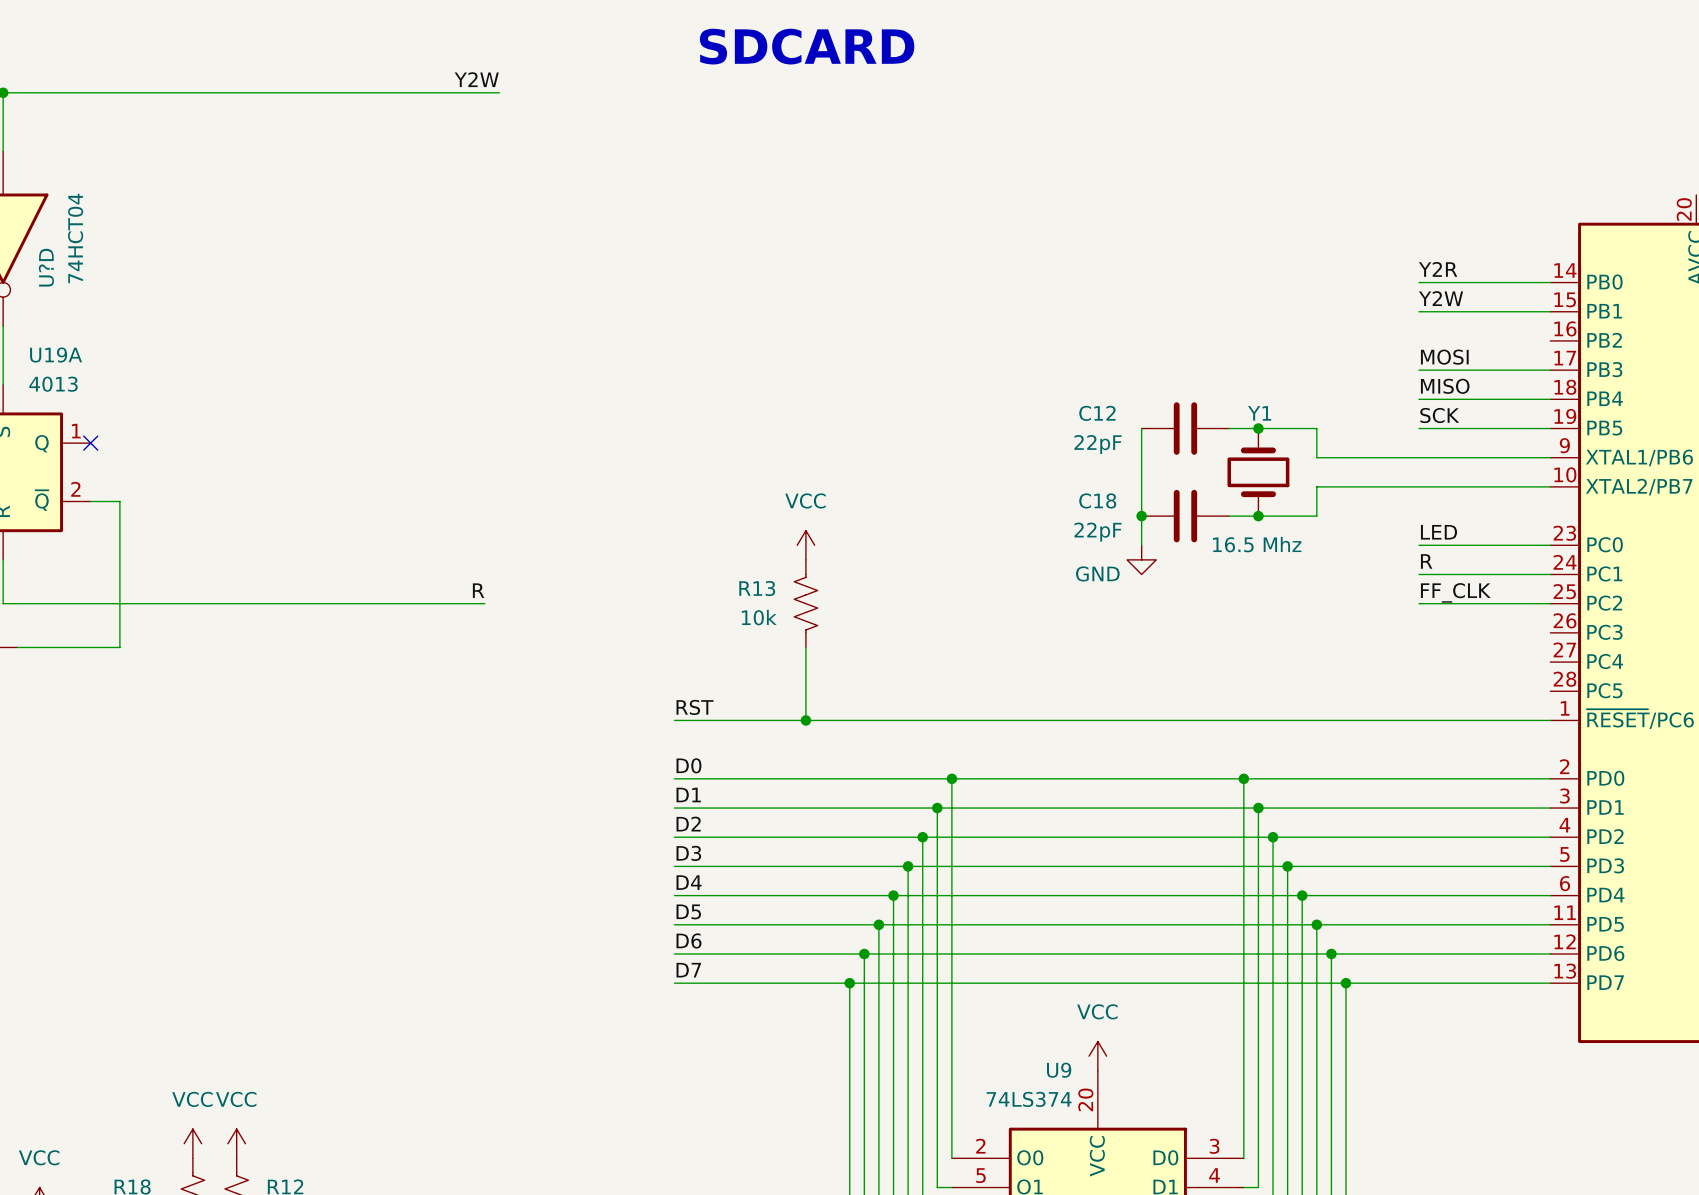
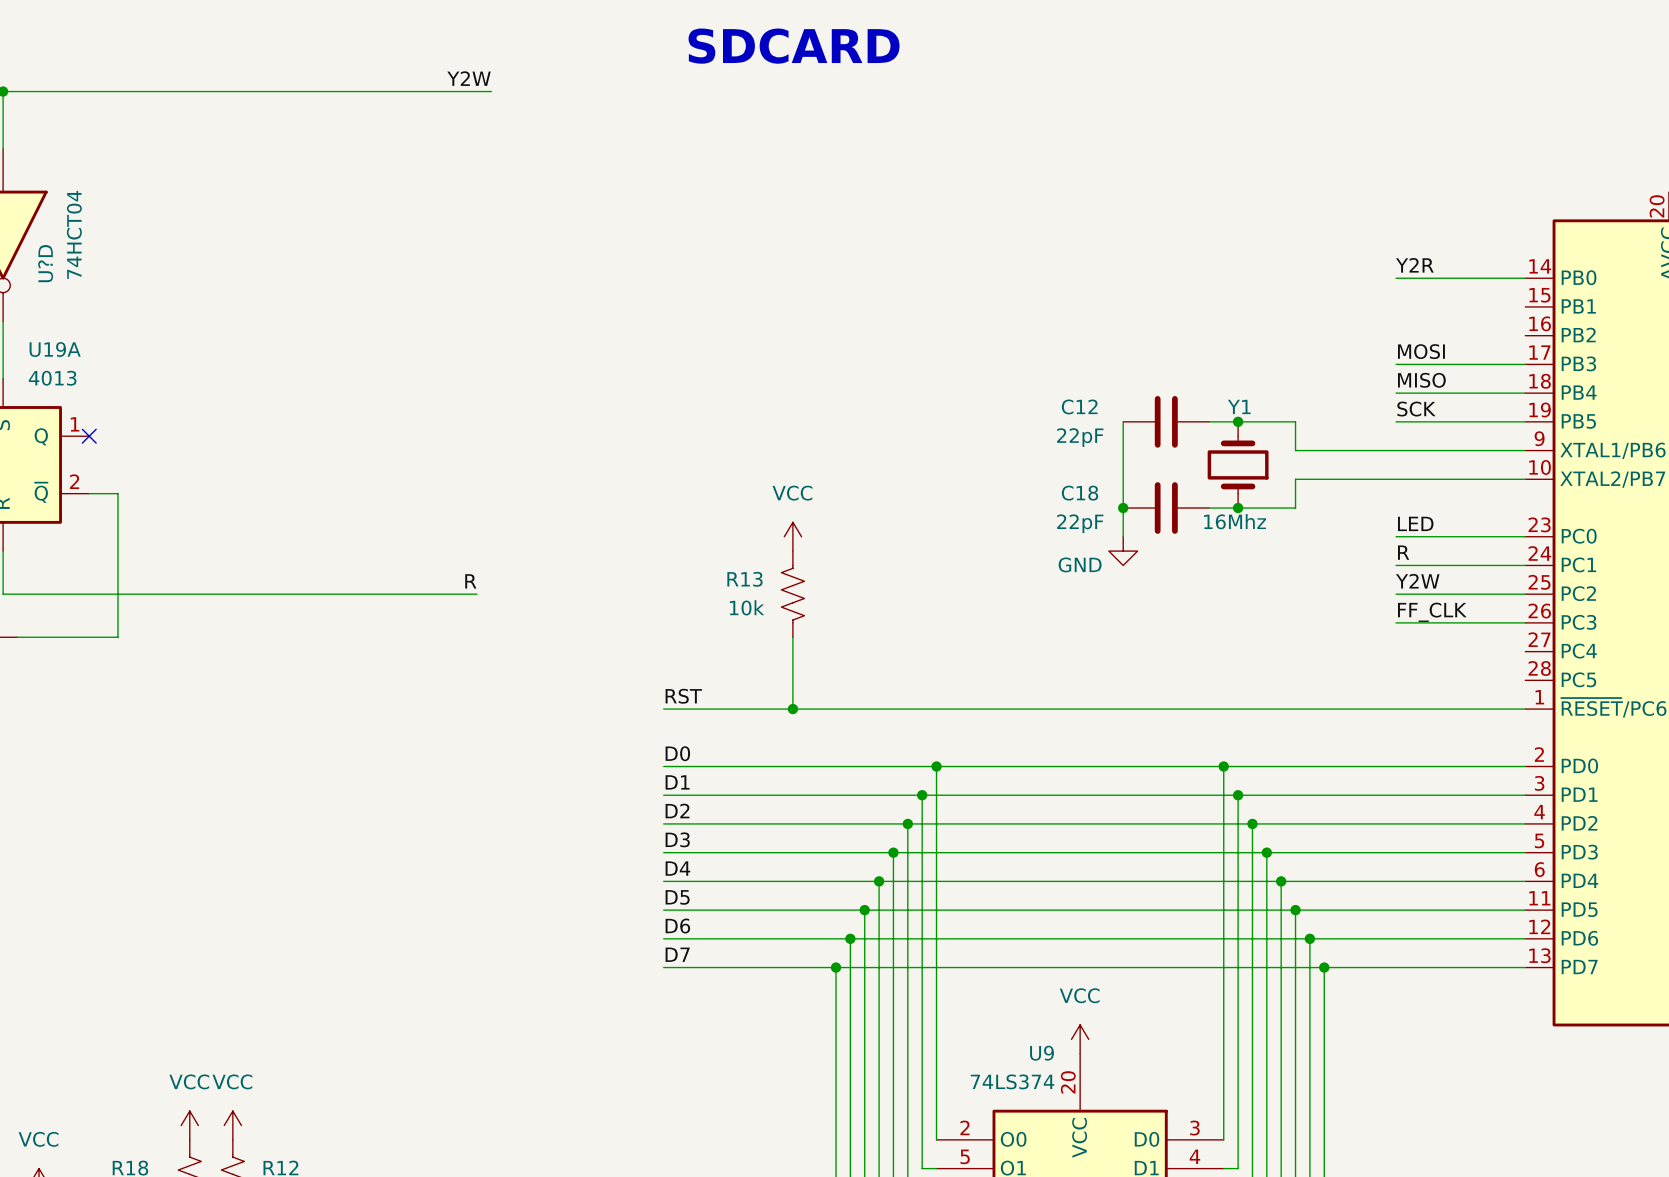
label: Y2W (1441, 298) -> none
wire: (1418, 311) (1550, 311) -> none
Y1 value: 16.5 Mhz (1257, 544) -> 16Mhz (1235, 521)
label: FF_CLK (1455, 592) -> Y2W (1417, 581)
label: none -> FF_CLK (1432, 612)
wire: none -> (1396, 622) (1525, 622)

